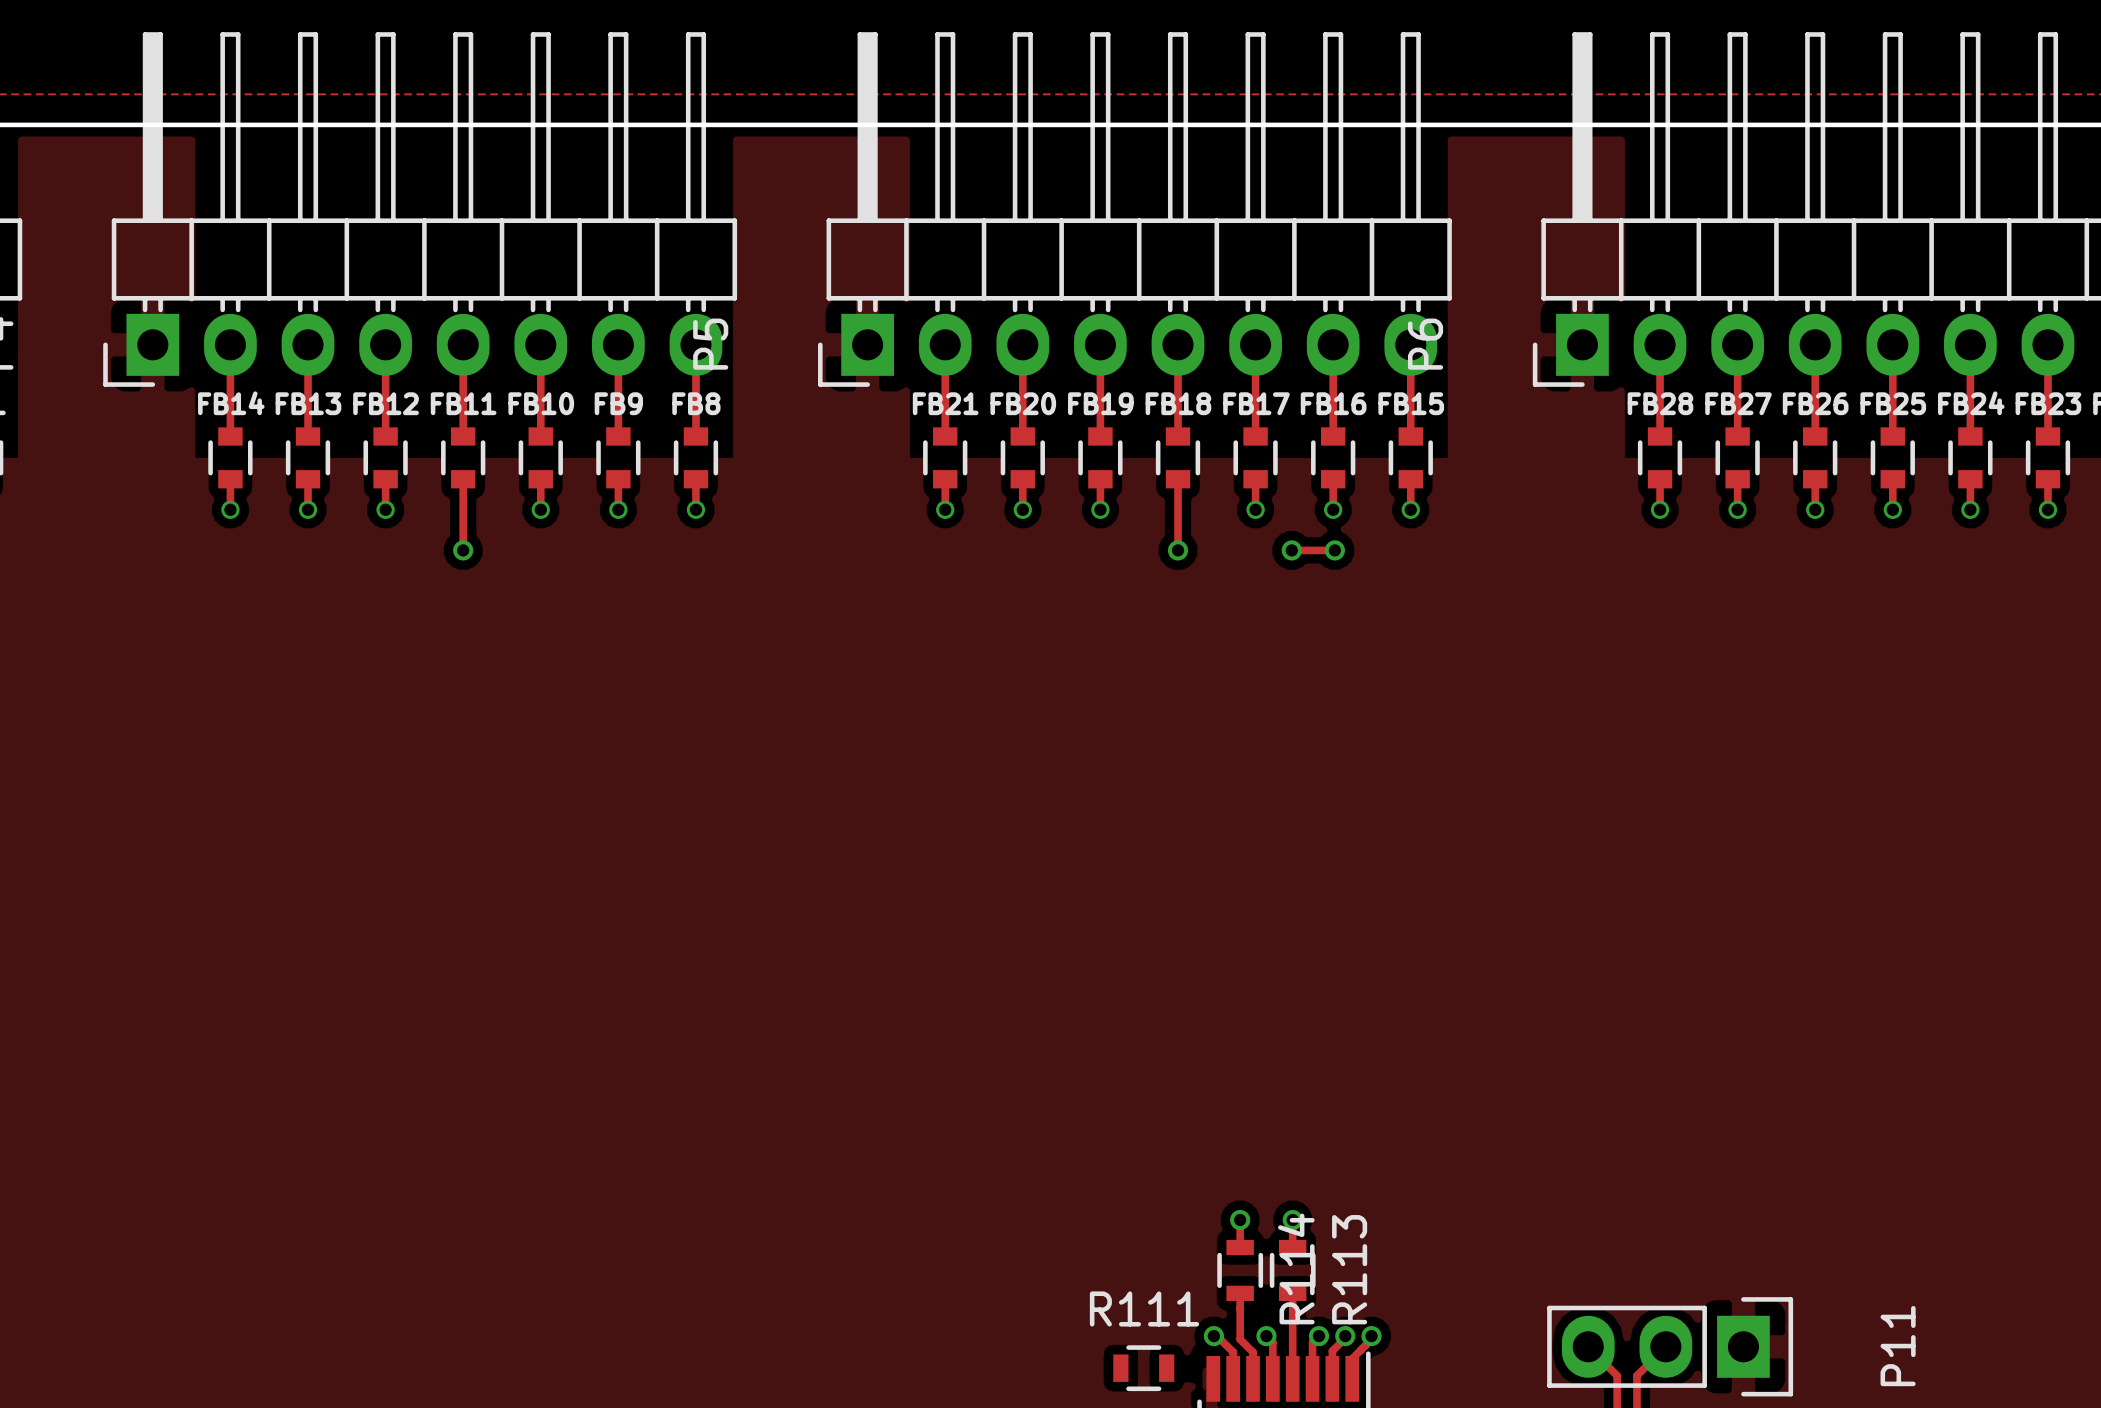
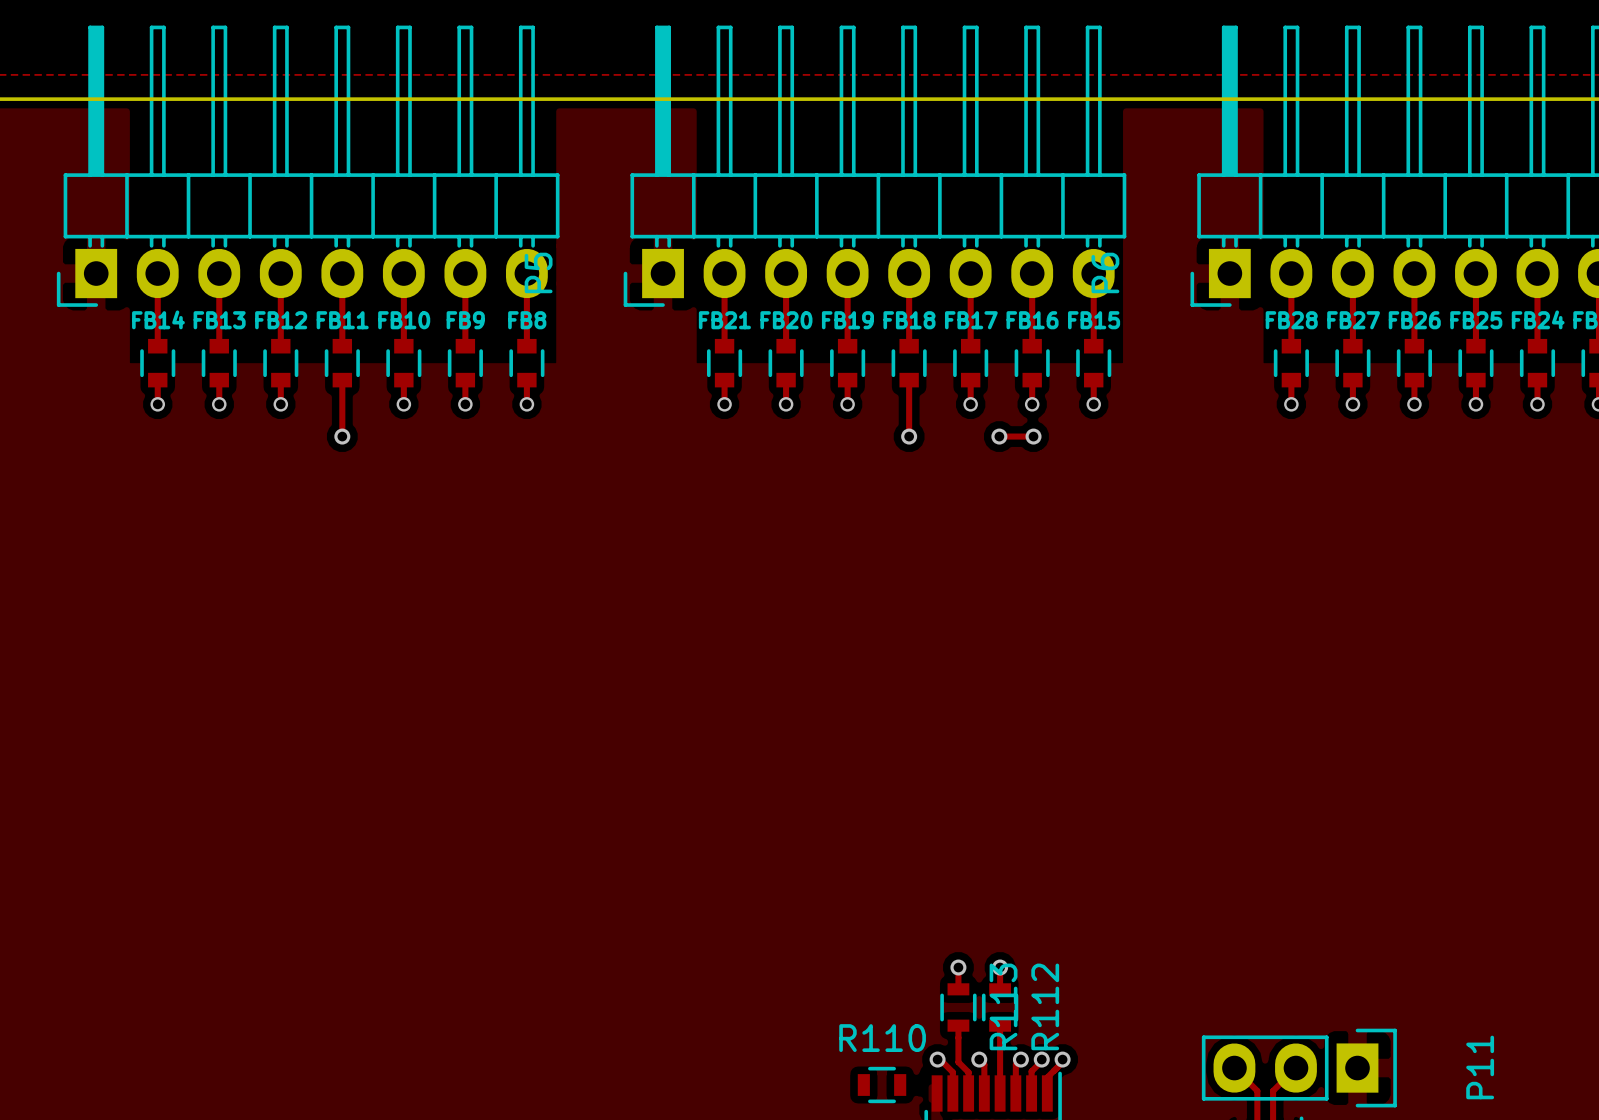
R114 name: R114 (1296, 1268) -> R113 (1003, 1006)
R113 name: R113 (1349, 1269) -> R112 (1045, 1006)
R111 name: R111 (1144, 1308) -> R110 (882, 1038)

